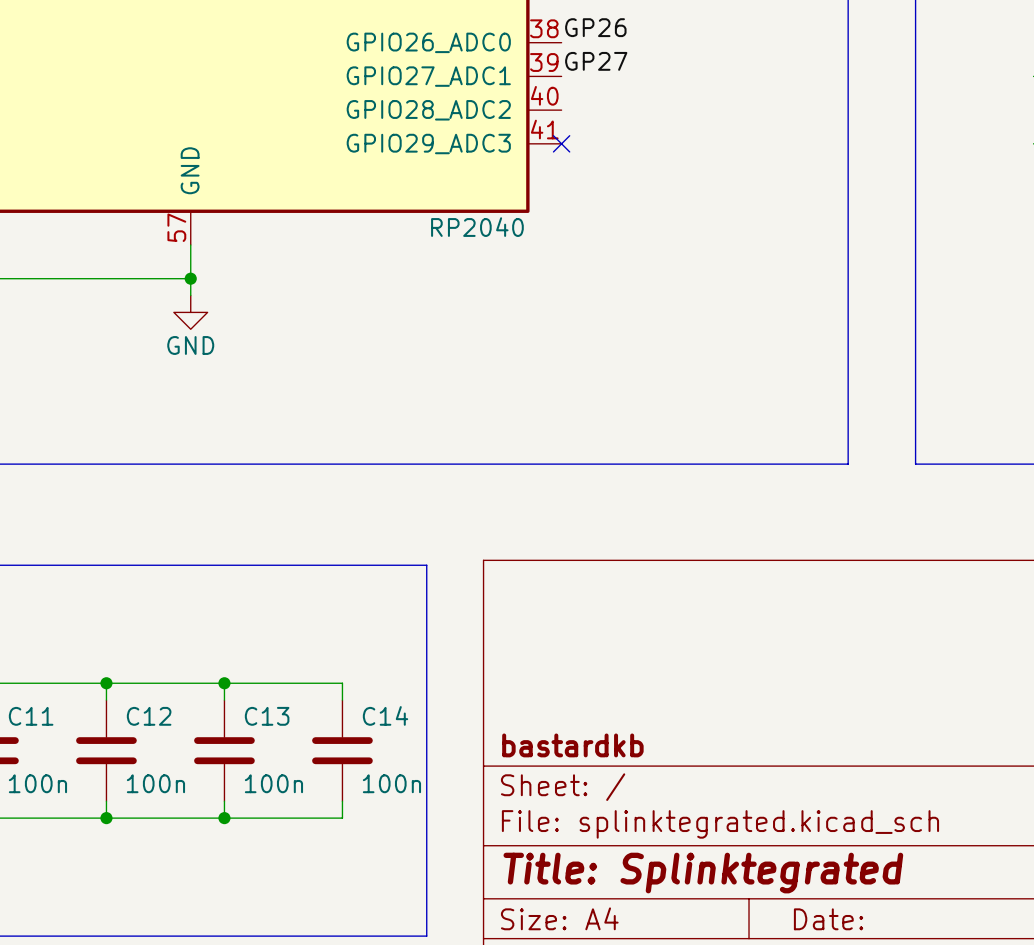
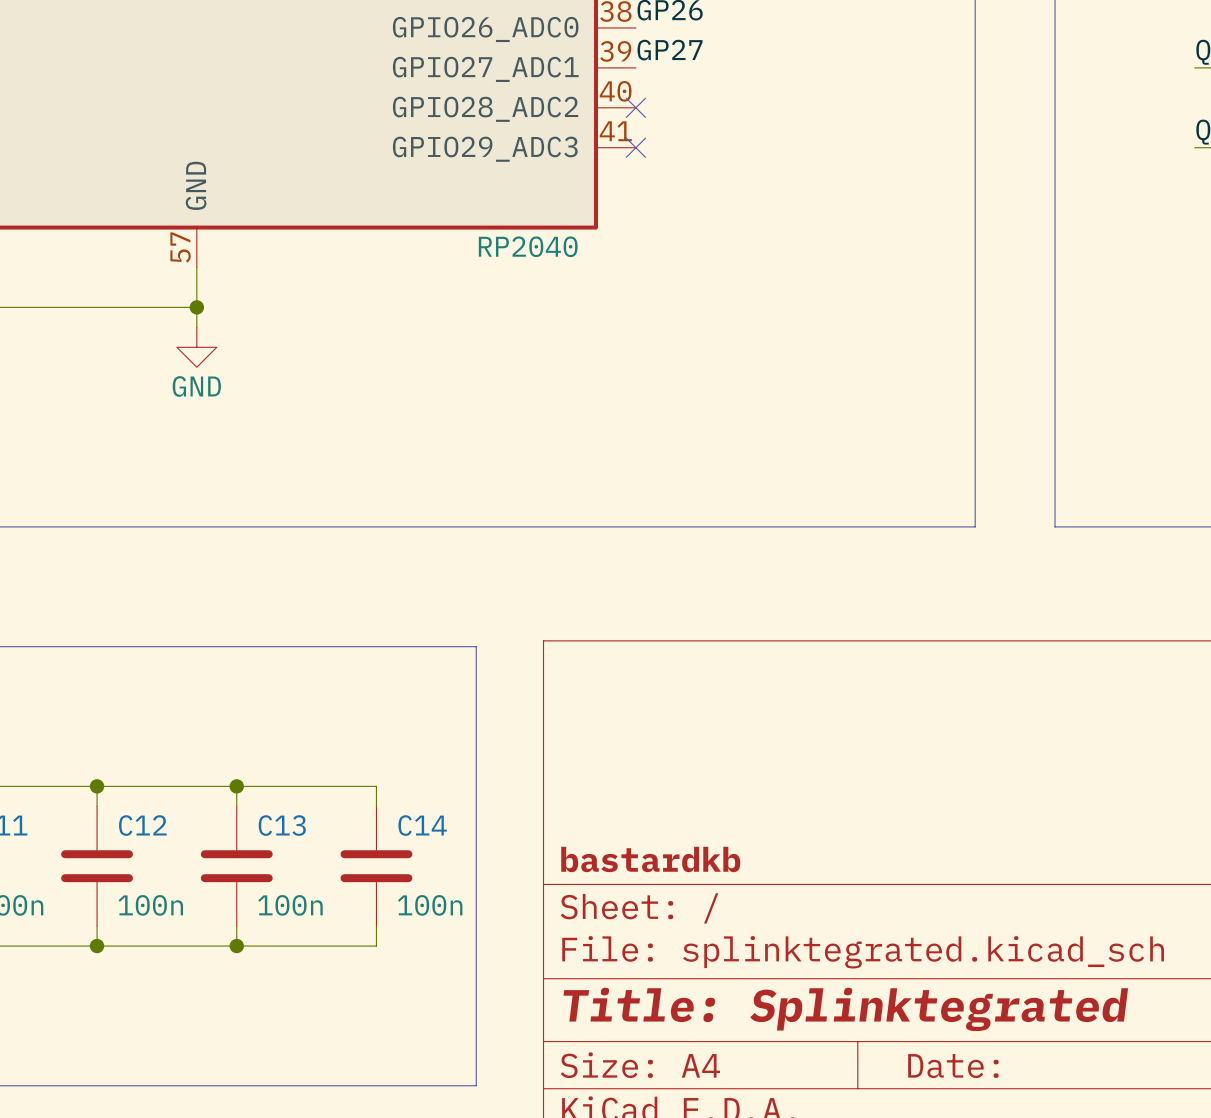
no-connect mark: none -> (635, 107)

